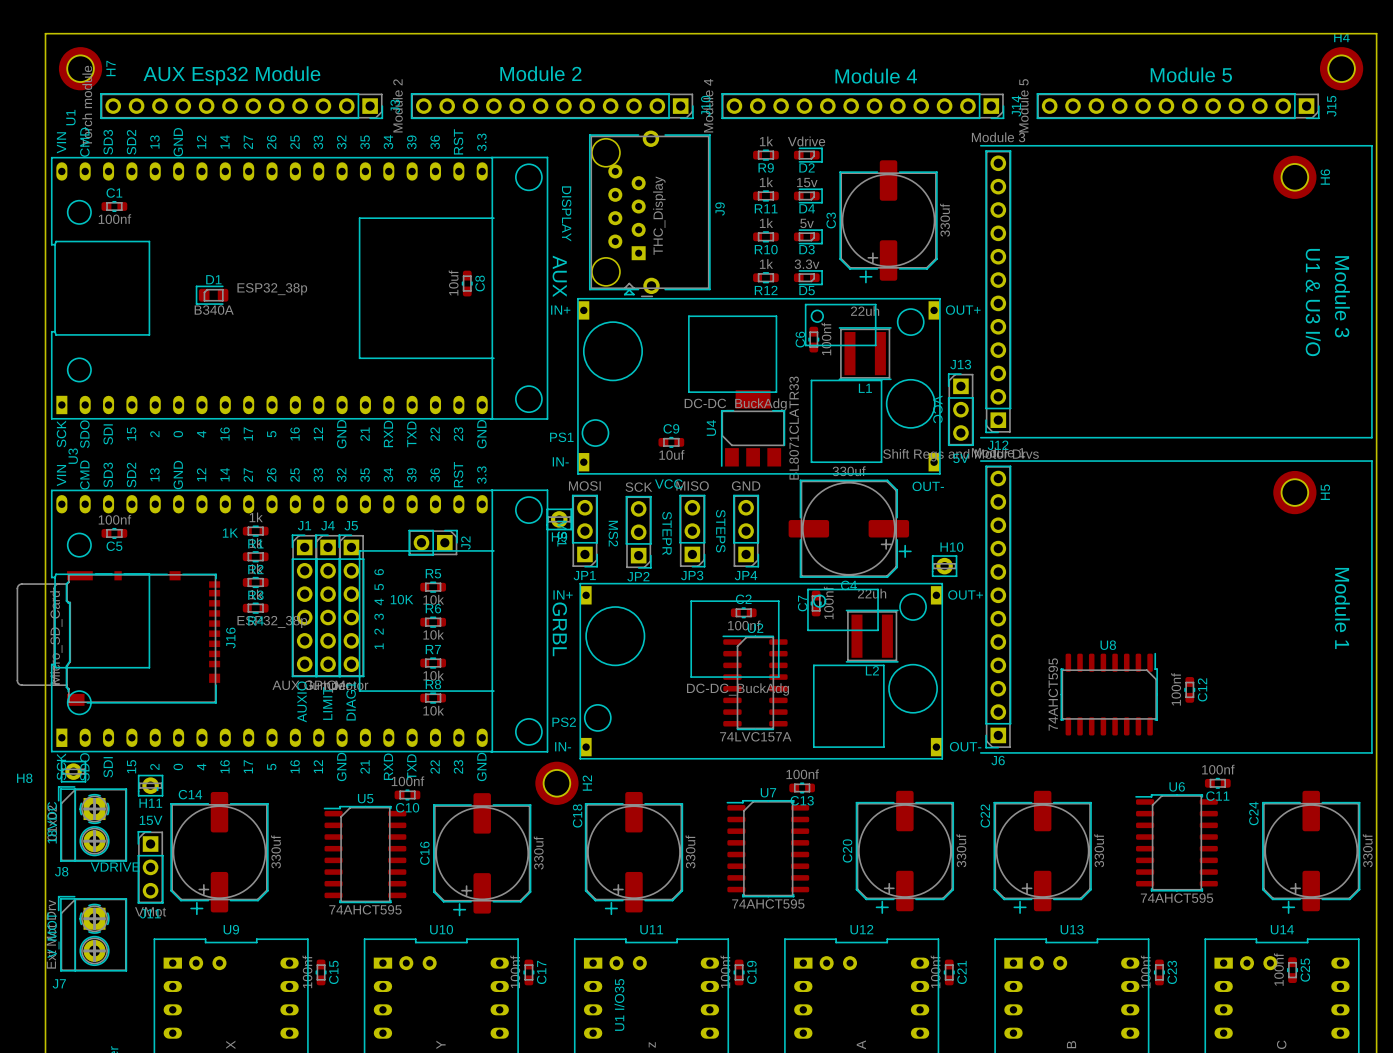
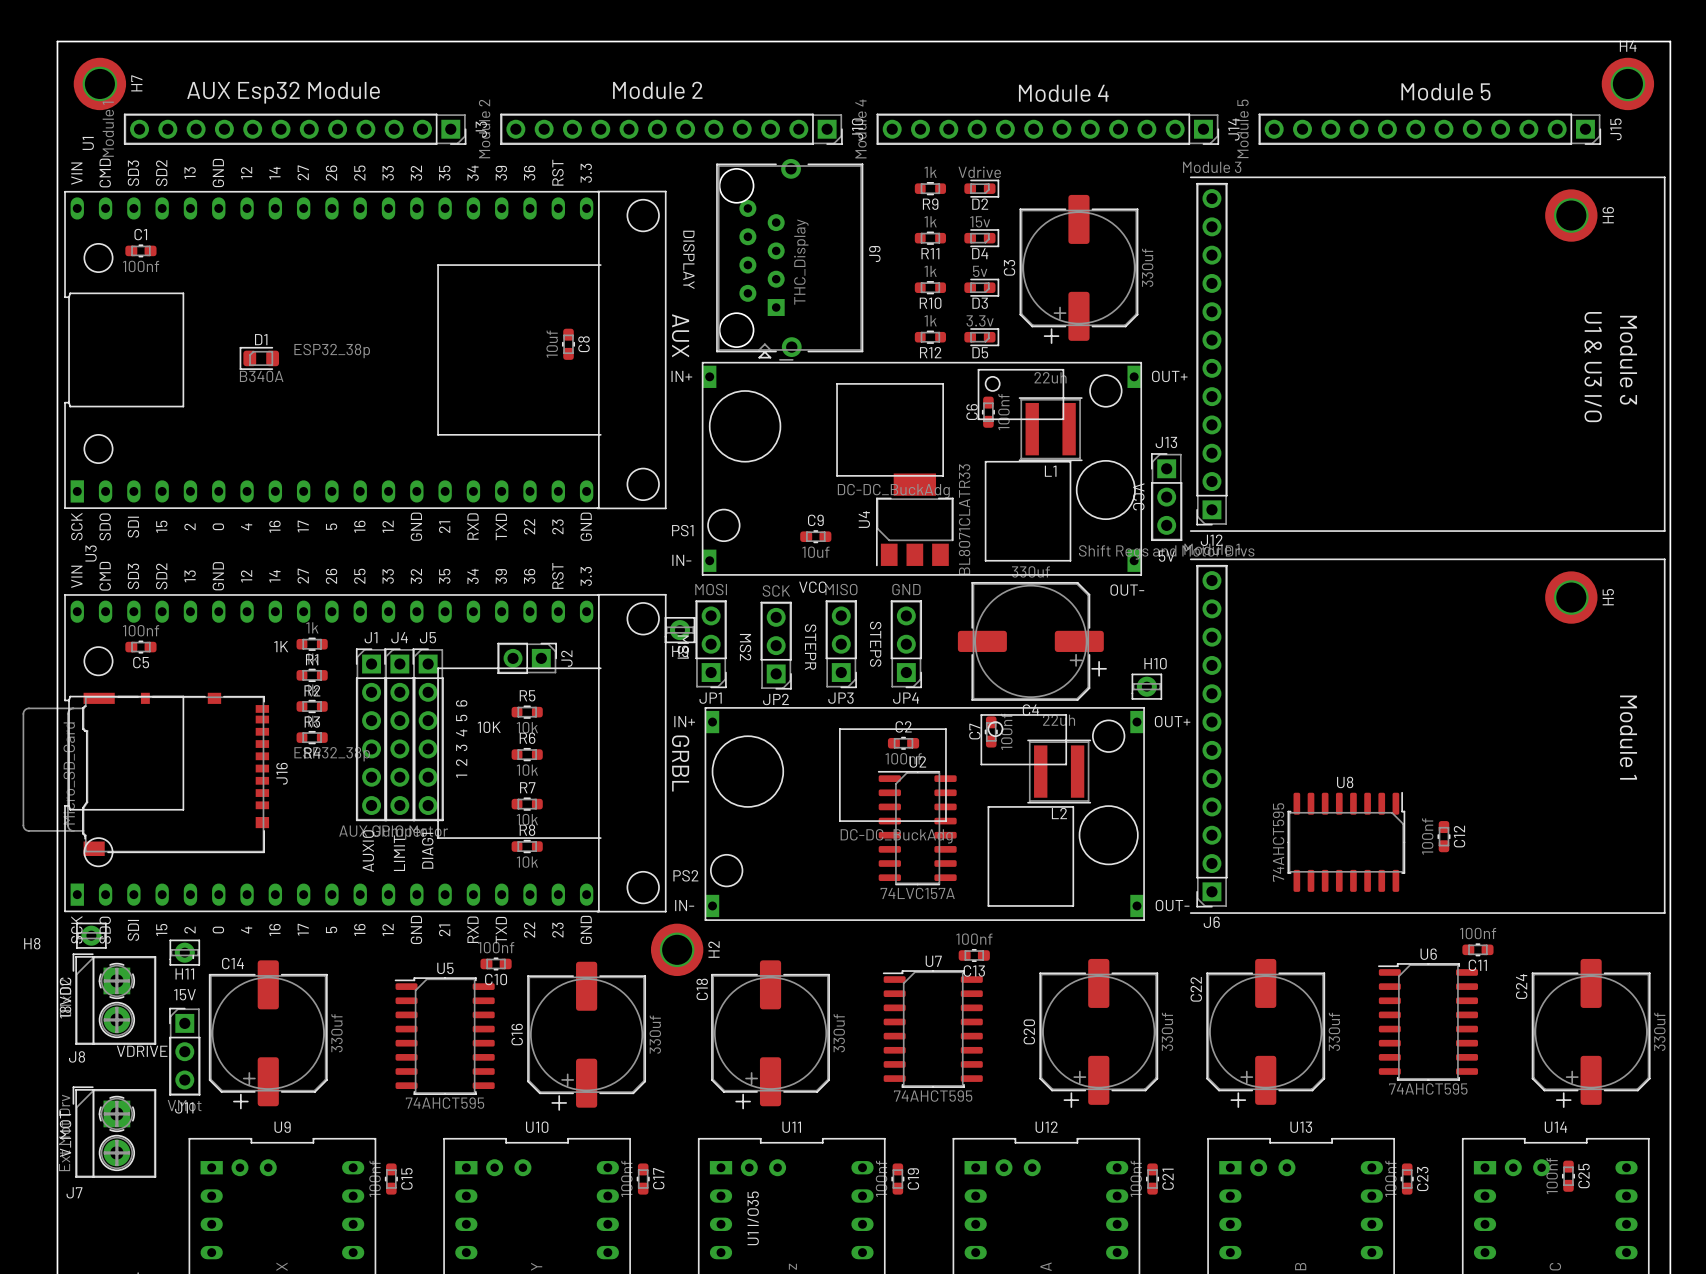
J3 value: Torch module (87, 106) -> Module 1 (108, 129)

